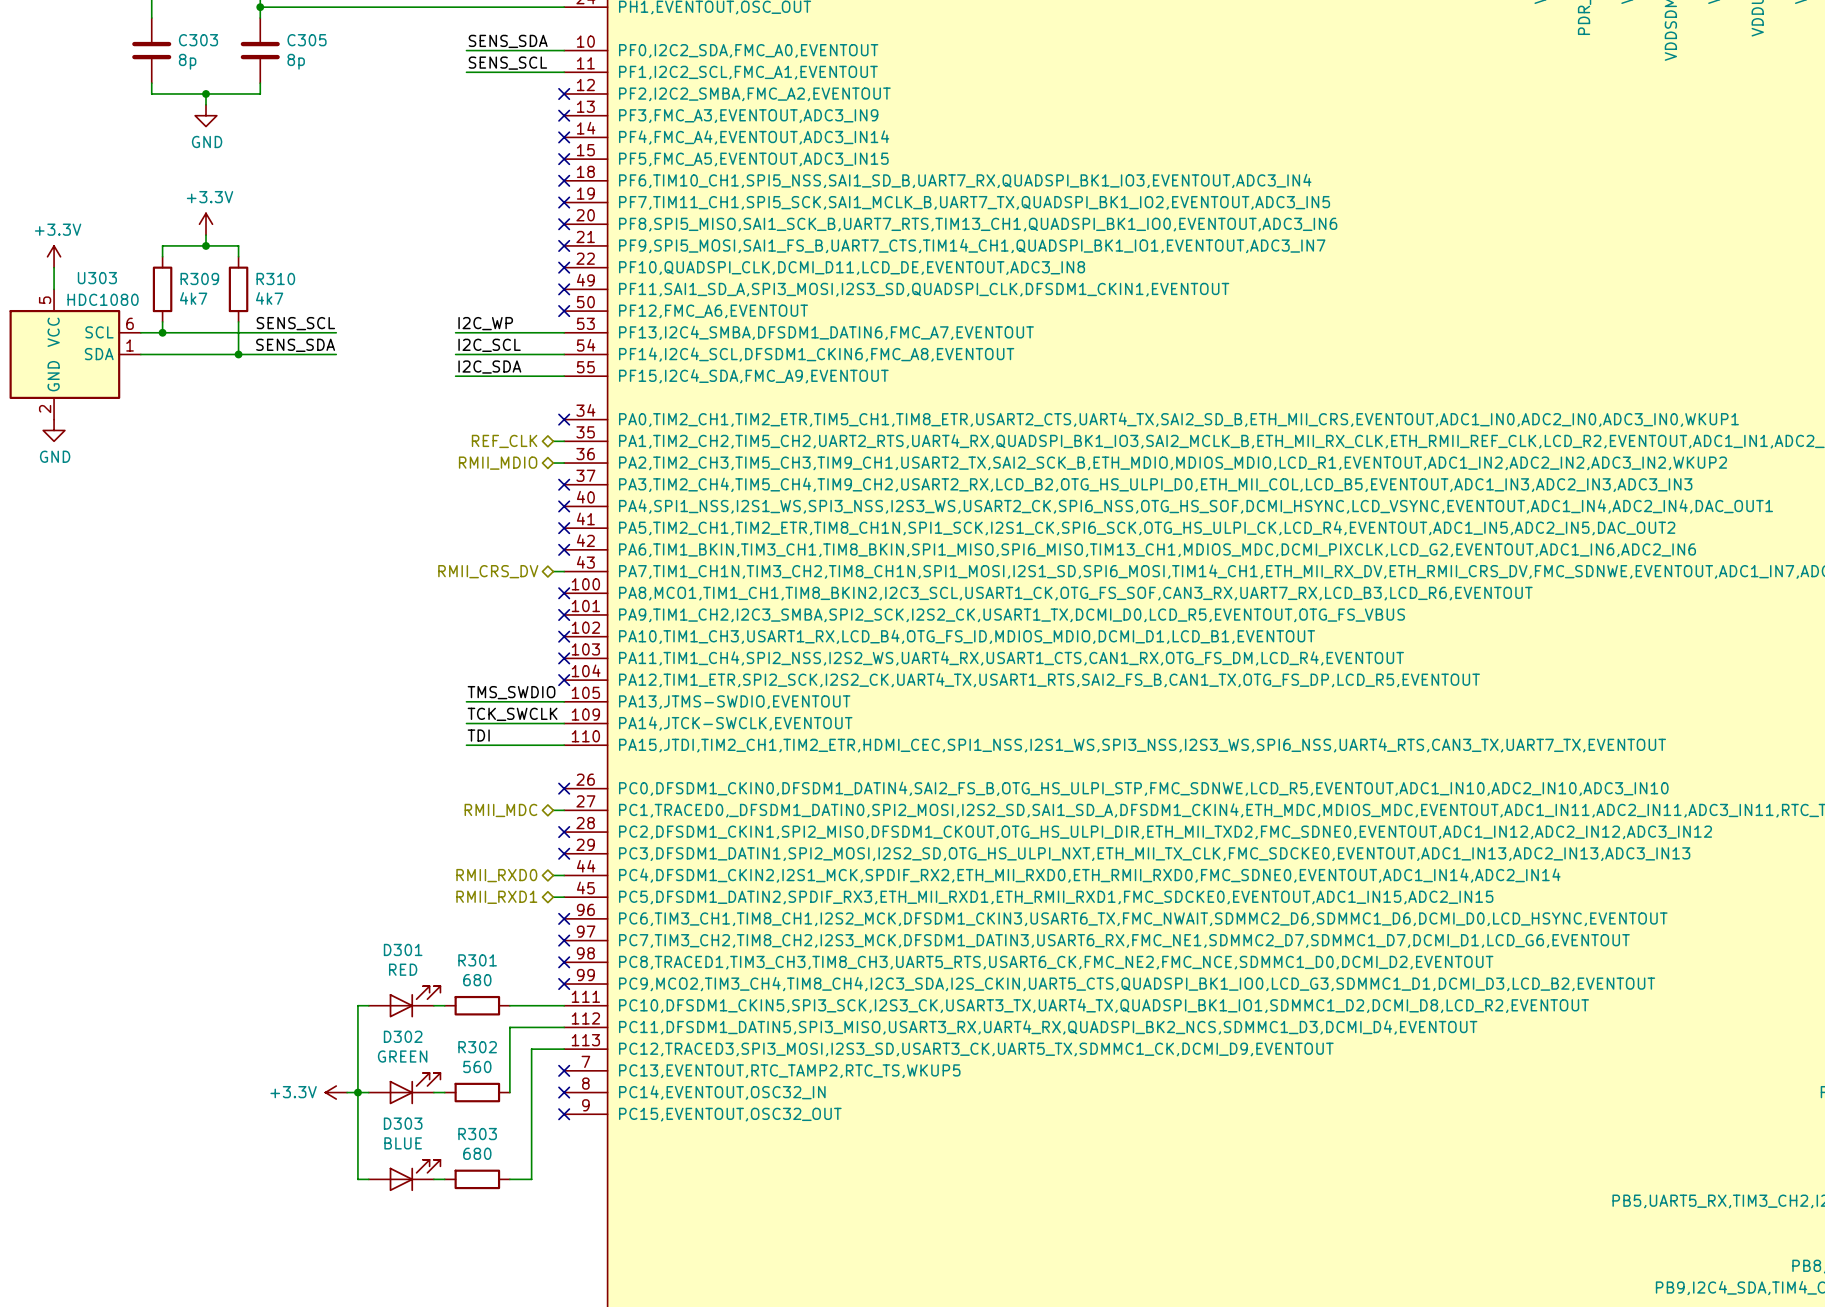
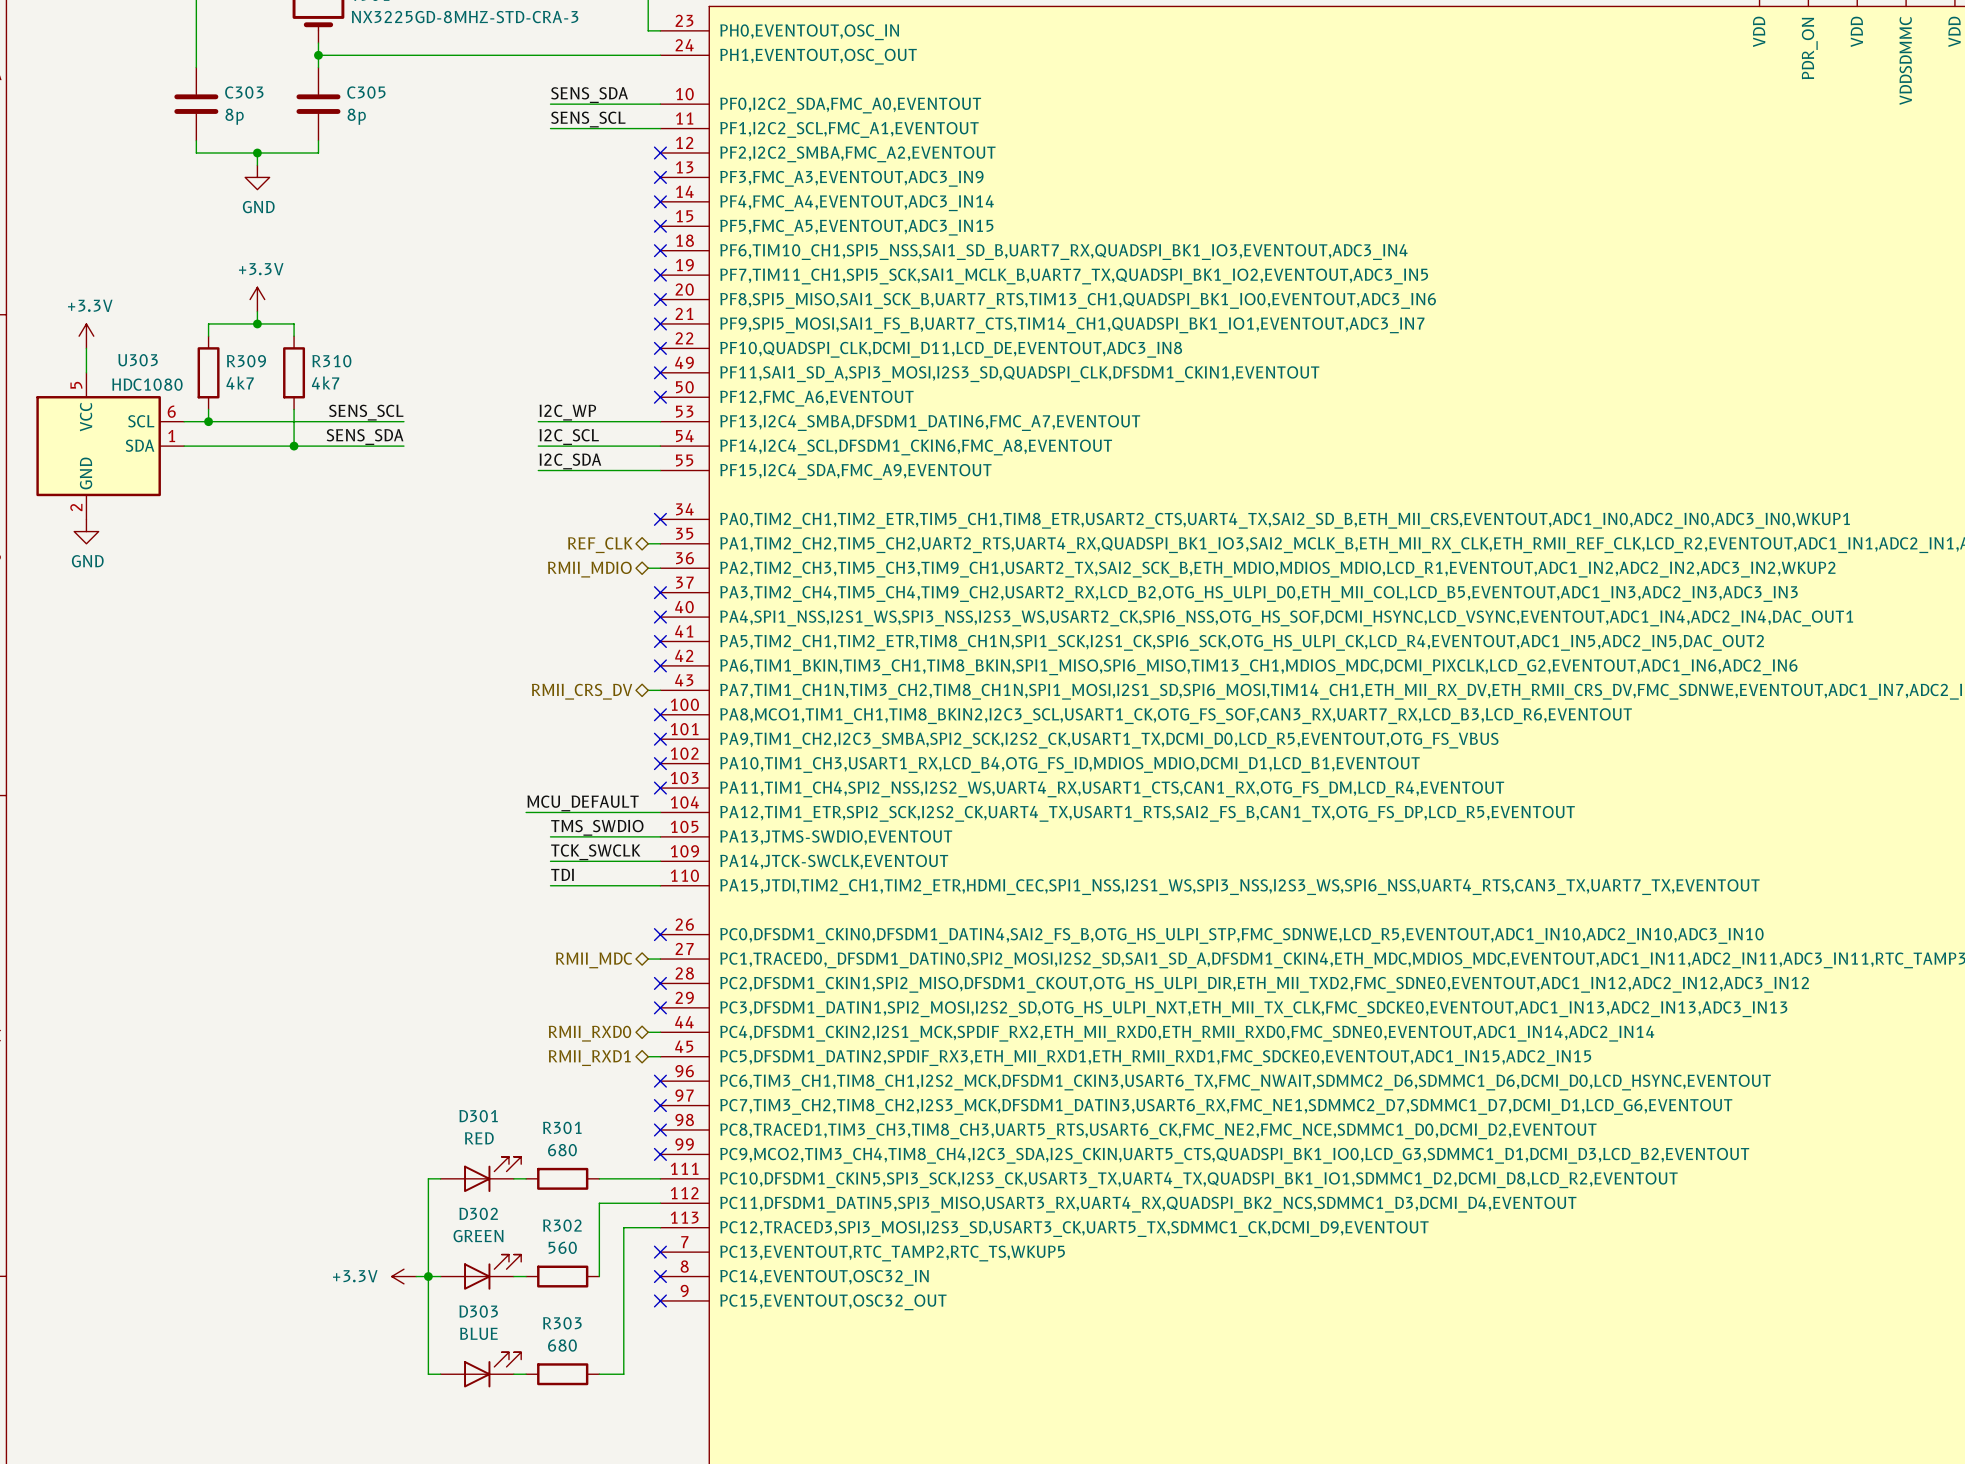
label: none -> MCU_DEFAULT (583, 803)
wire: none -> (526, 812) (660, 812)
no-connect mark: (564, 680) -> none

